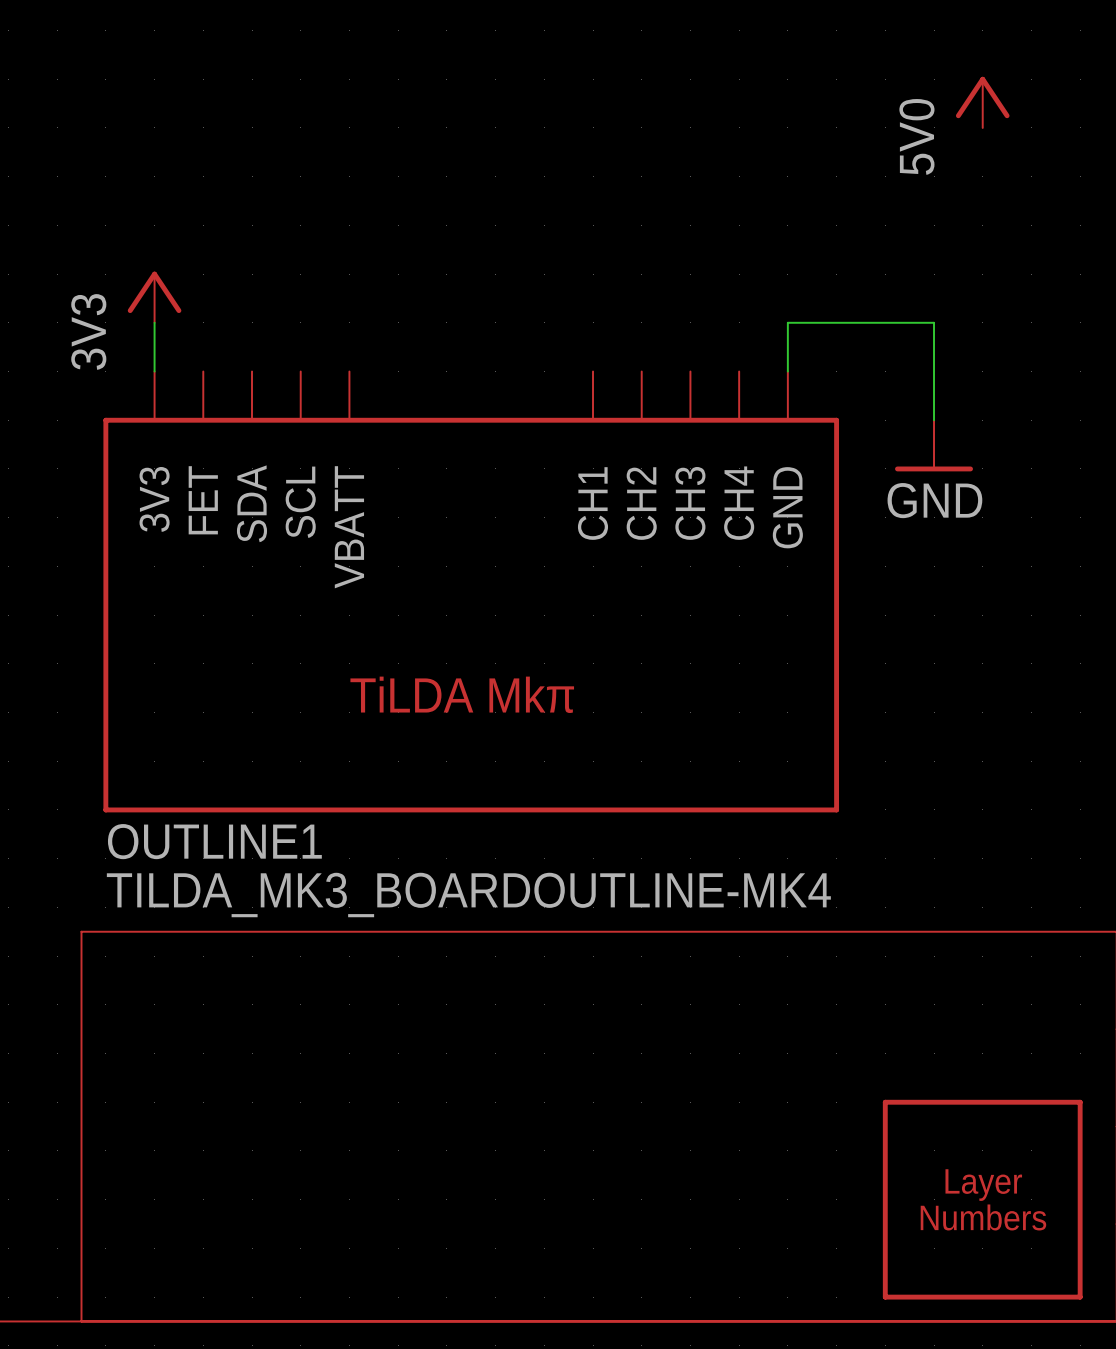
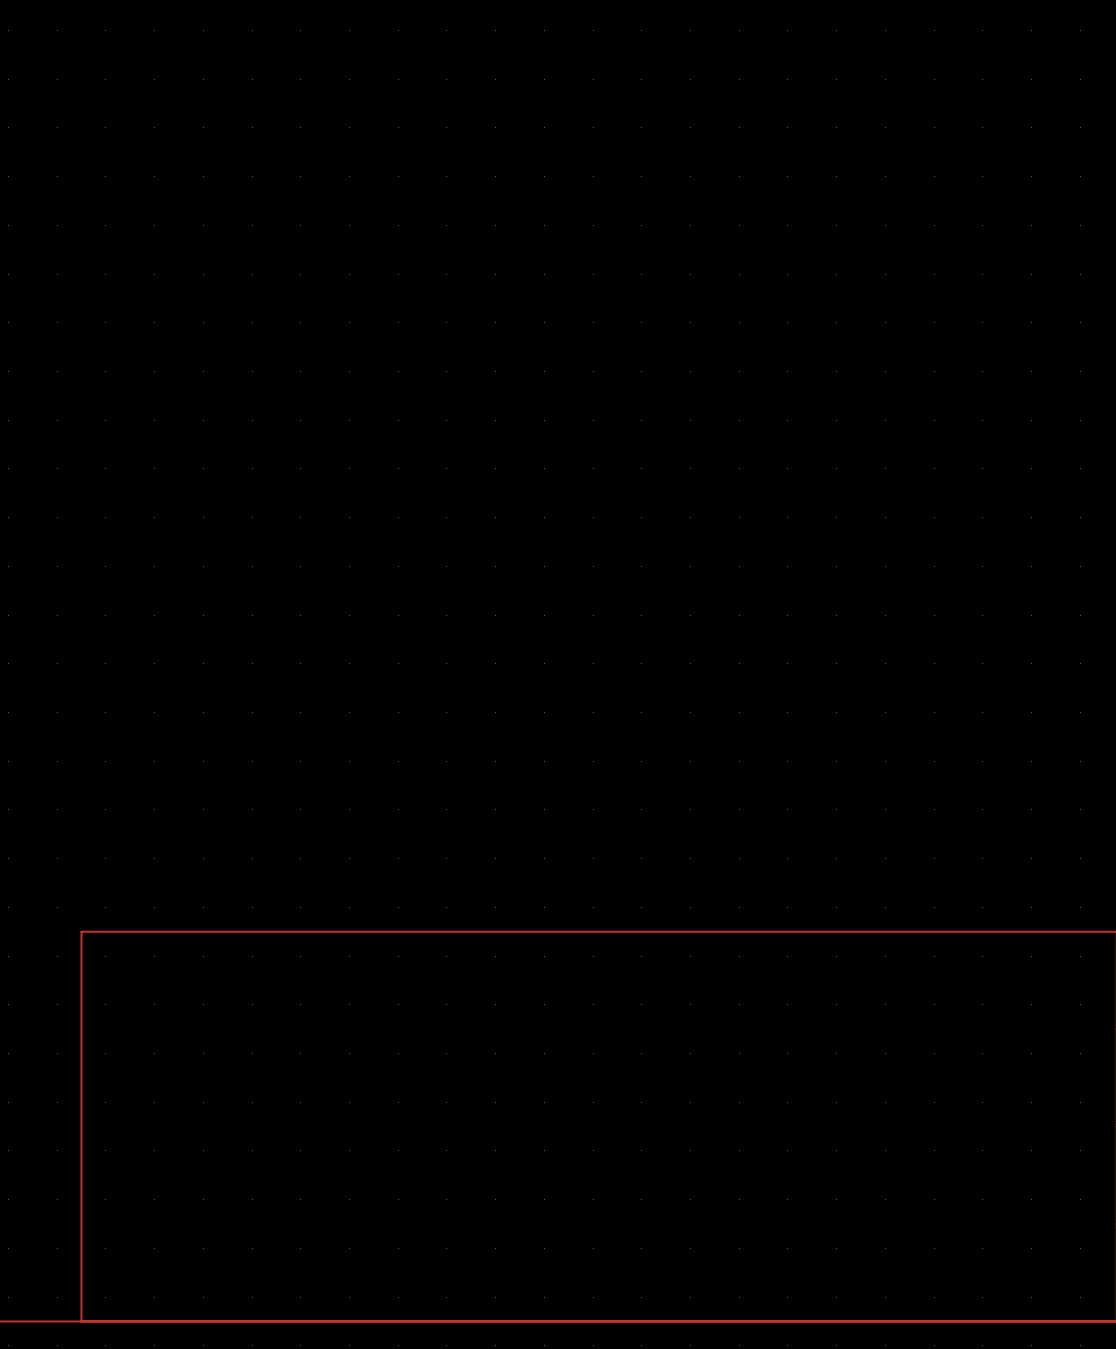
power symbol: 5V0 (982, 102) -> none
power symbol: 3V3 (154, 297) -> none
wire: (154, 322) (154, 371) -> none
wire: (787, 371) (787, 322) (934, 322) (934, 420) -> none
power symbol: GND (934, 445) -> none
OUTLINE1: TILDA_MK3_BOARDOUTLINE-MK4 (471, 591) -> none
part: (982, 1199) -> none

